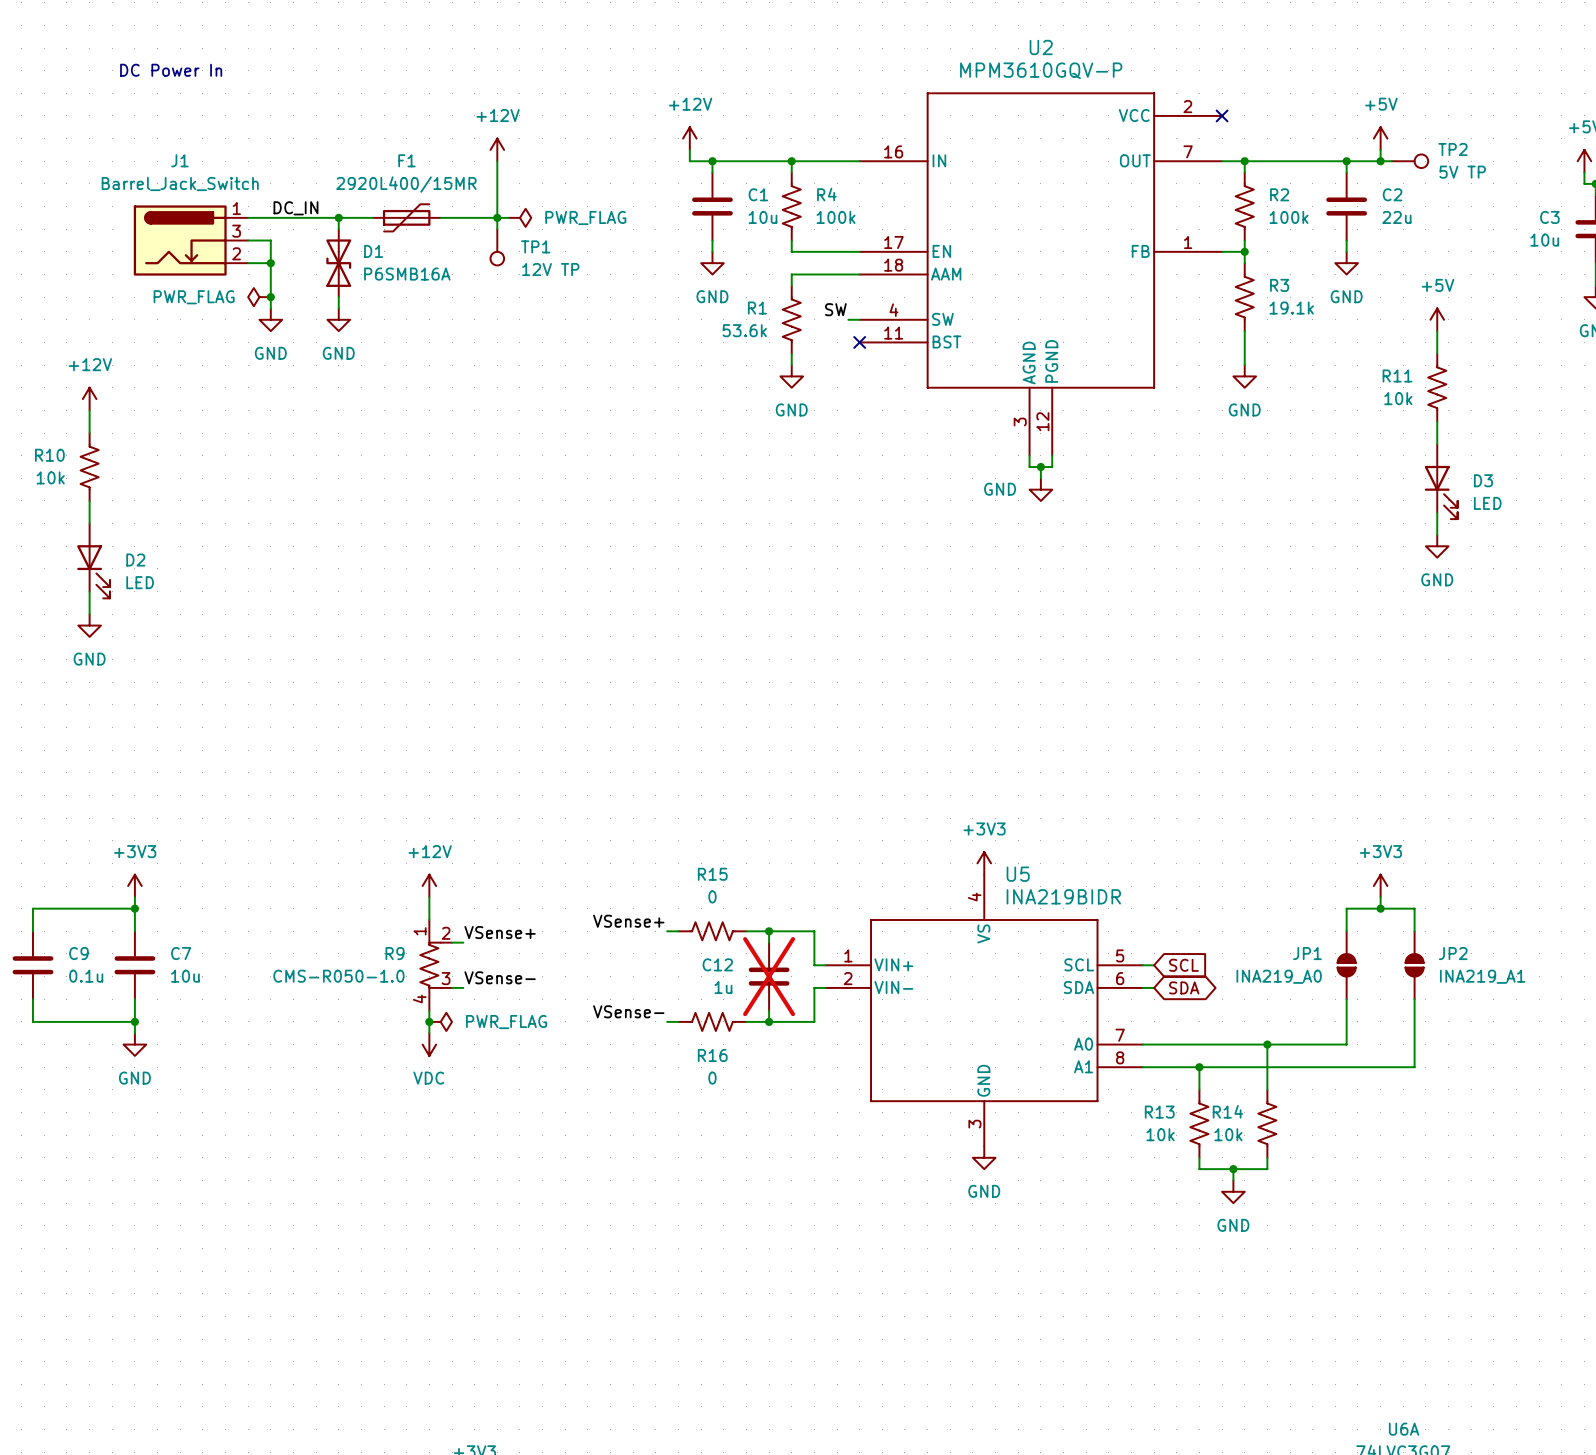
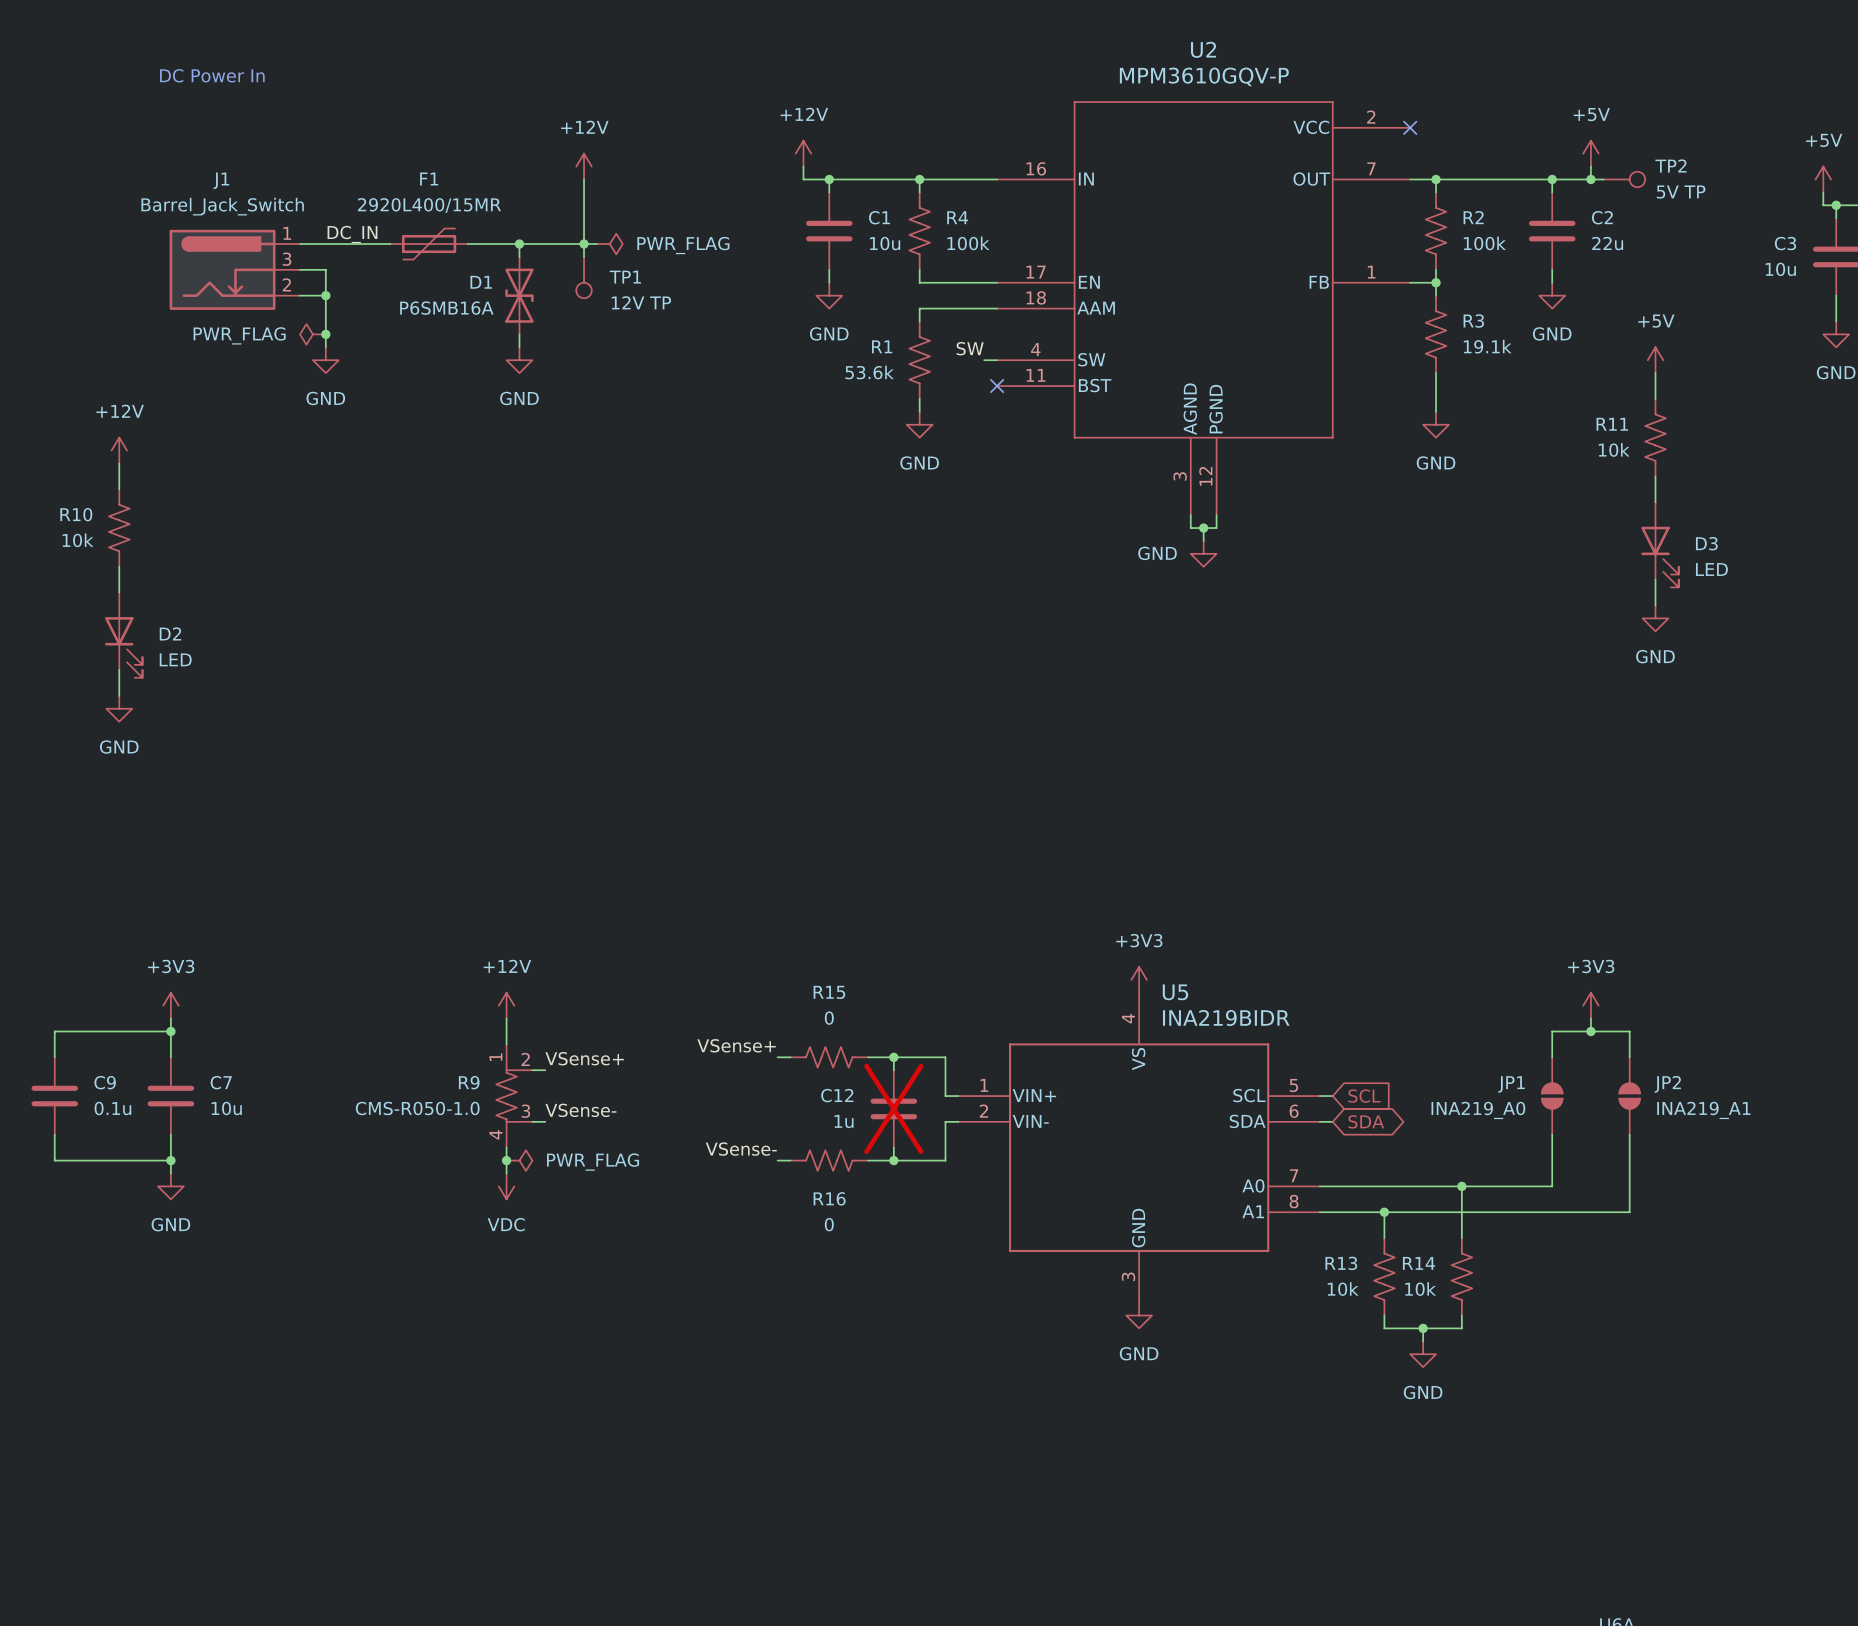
junction: (338, 217) -> none
F1 position: (406, 217) -> (429, 244)
junction: none -> (519, 244)
D1 name position: D1 (373, 251) -> D1 (481, 282)
D1 position: (338, 263) -> (519, 295)
D1 value position: P6SMB16A (407, 274) -> P6SMB16A (446, 308)
wire: (338, 297) (338, 308) -> (519, 334) (519, 347)
power symbol position: GND (338, 319) -> GND (519, 360)

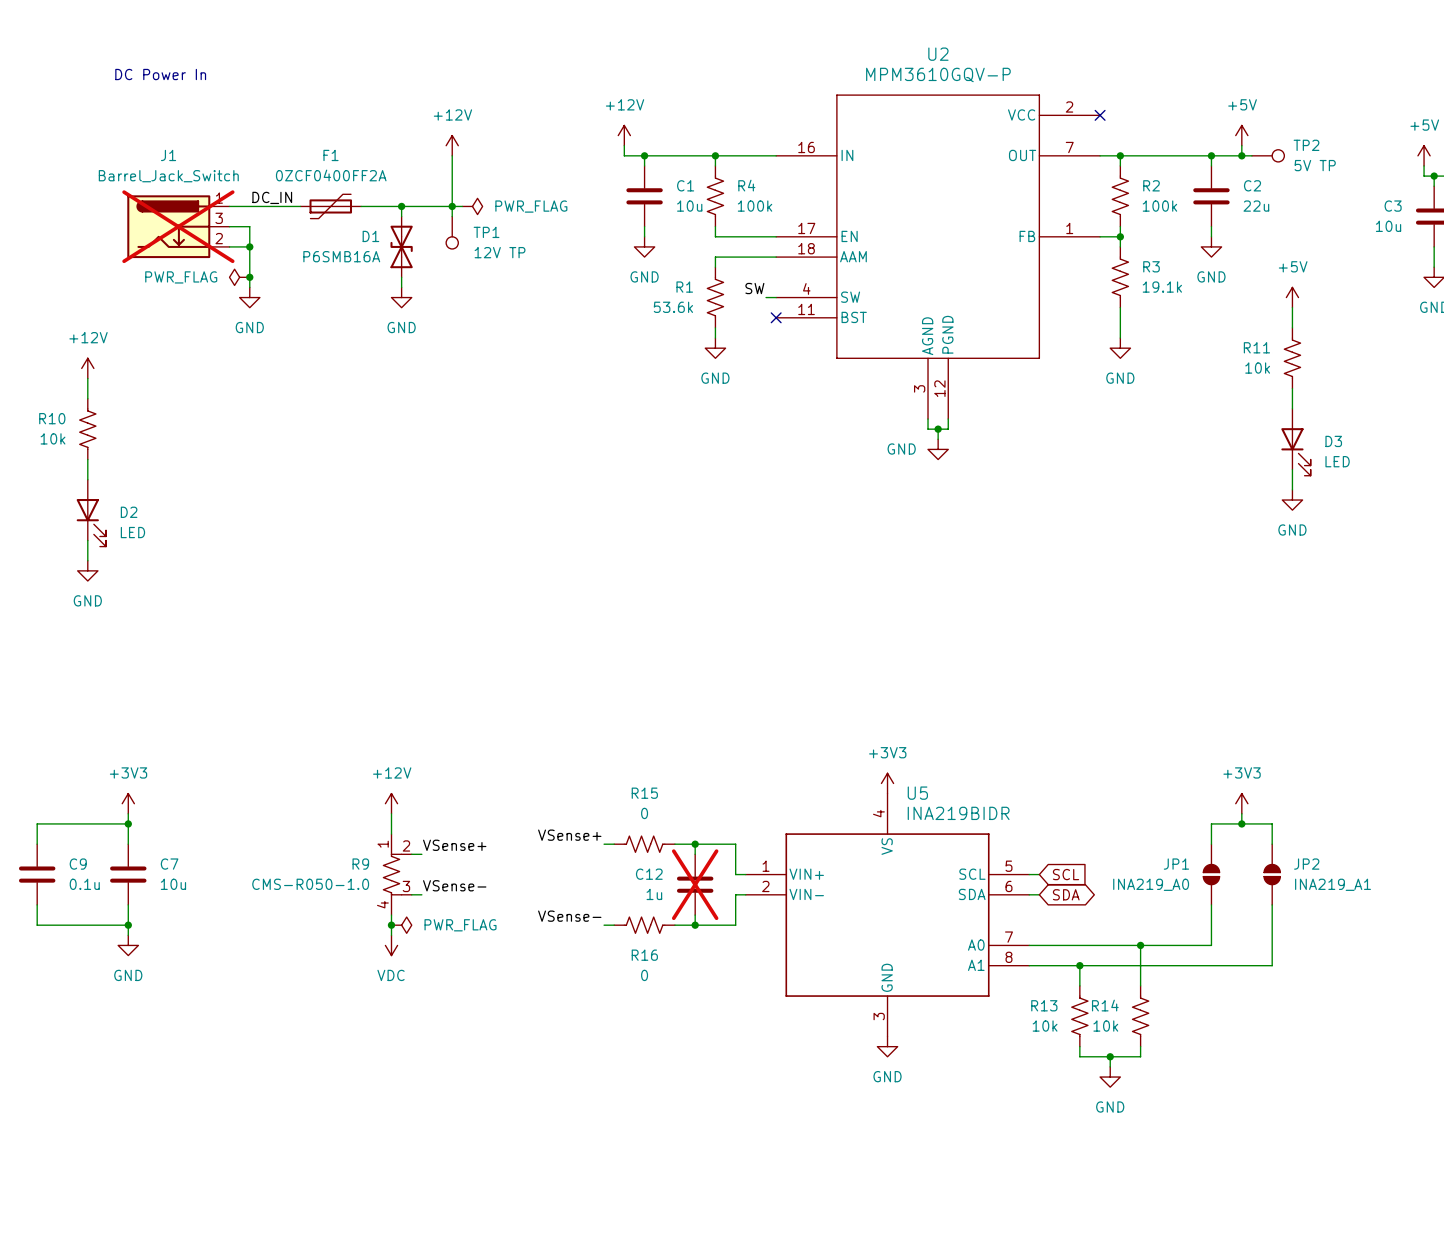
F1 value: 2920L400/15MR (429, 205) -> 0ZCF0400FF2A (331, 175)
J1 do-not-place cross: none -> (178, 226)

